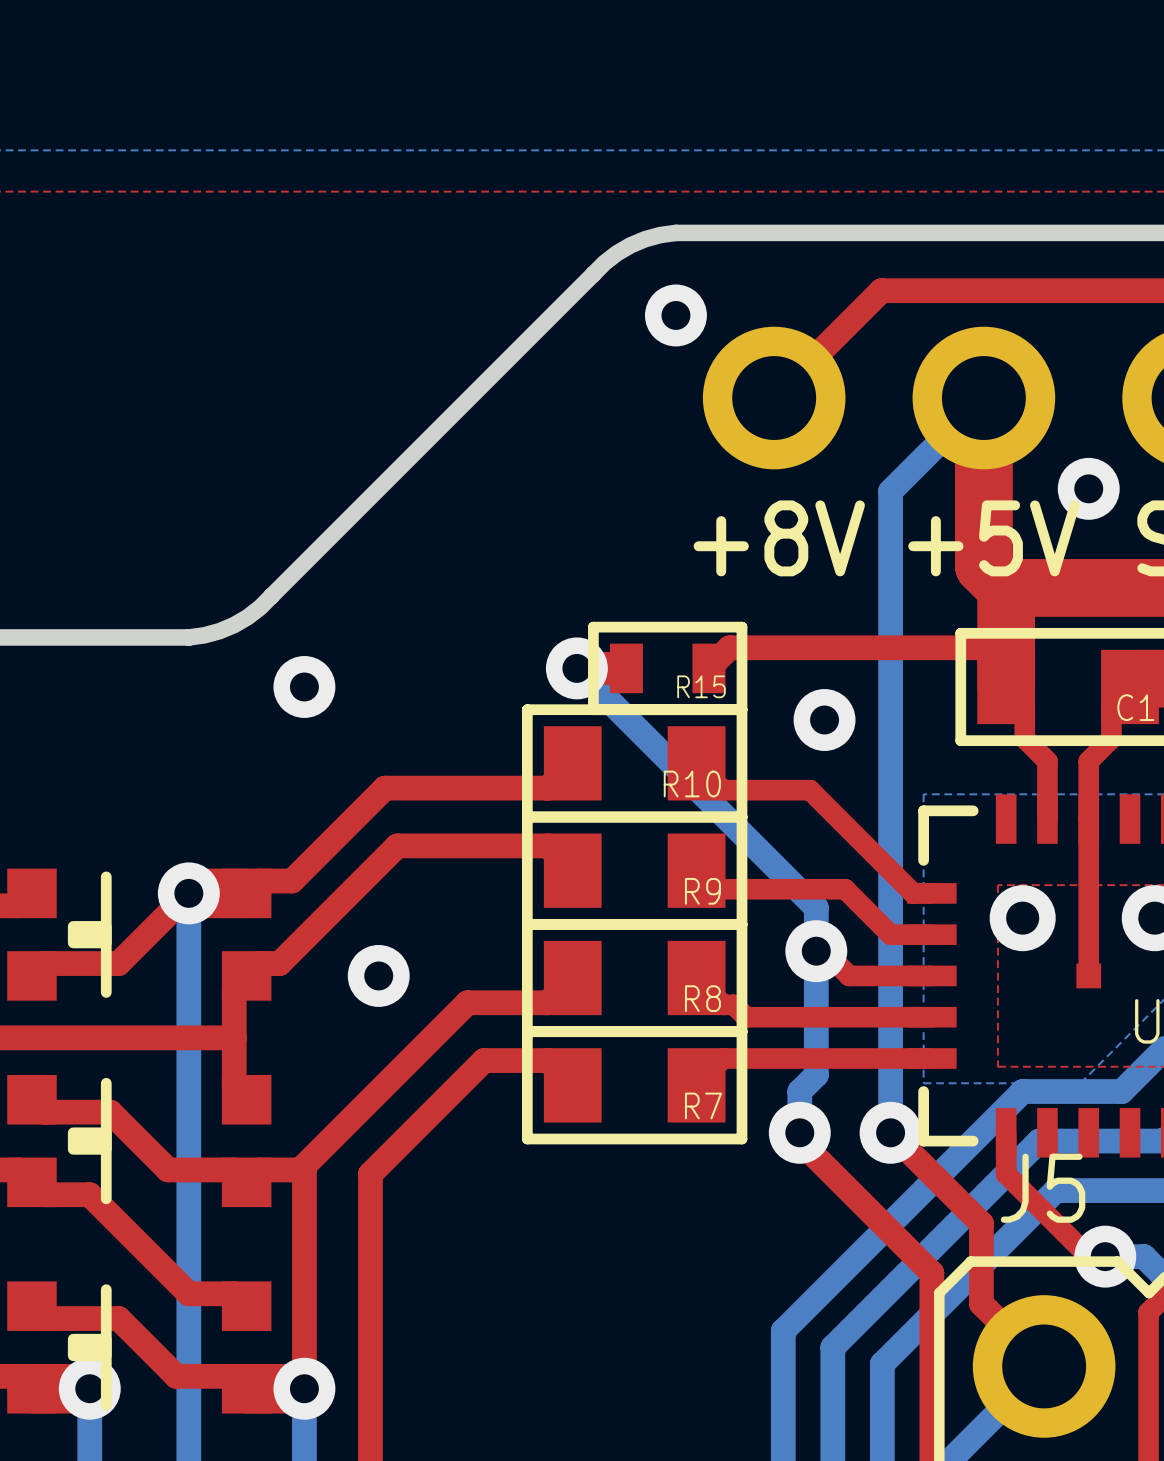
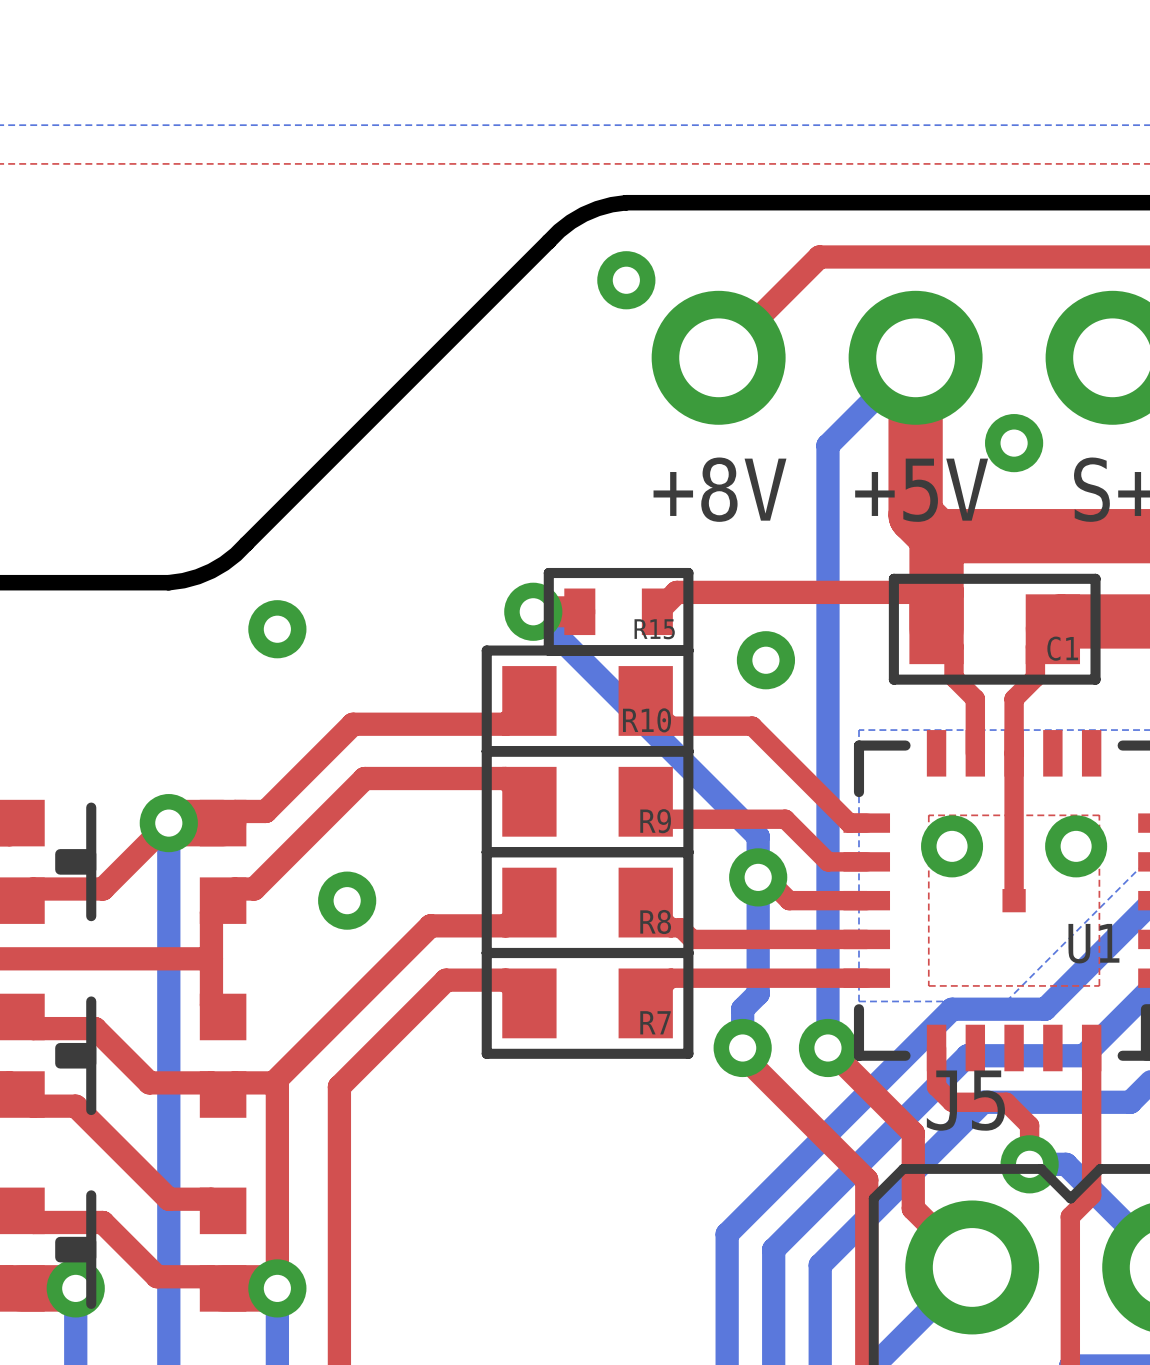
top track: (1022, 1190) (1088, 1256) (1105, 1256) -> (952, 1102) (1006, 1102) (1029, 1125) (1029, 1164)

